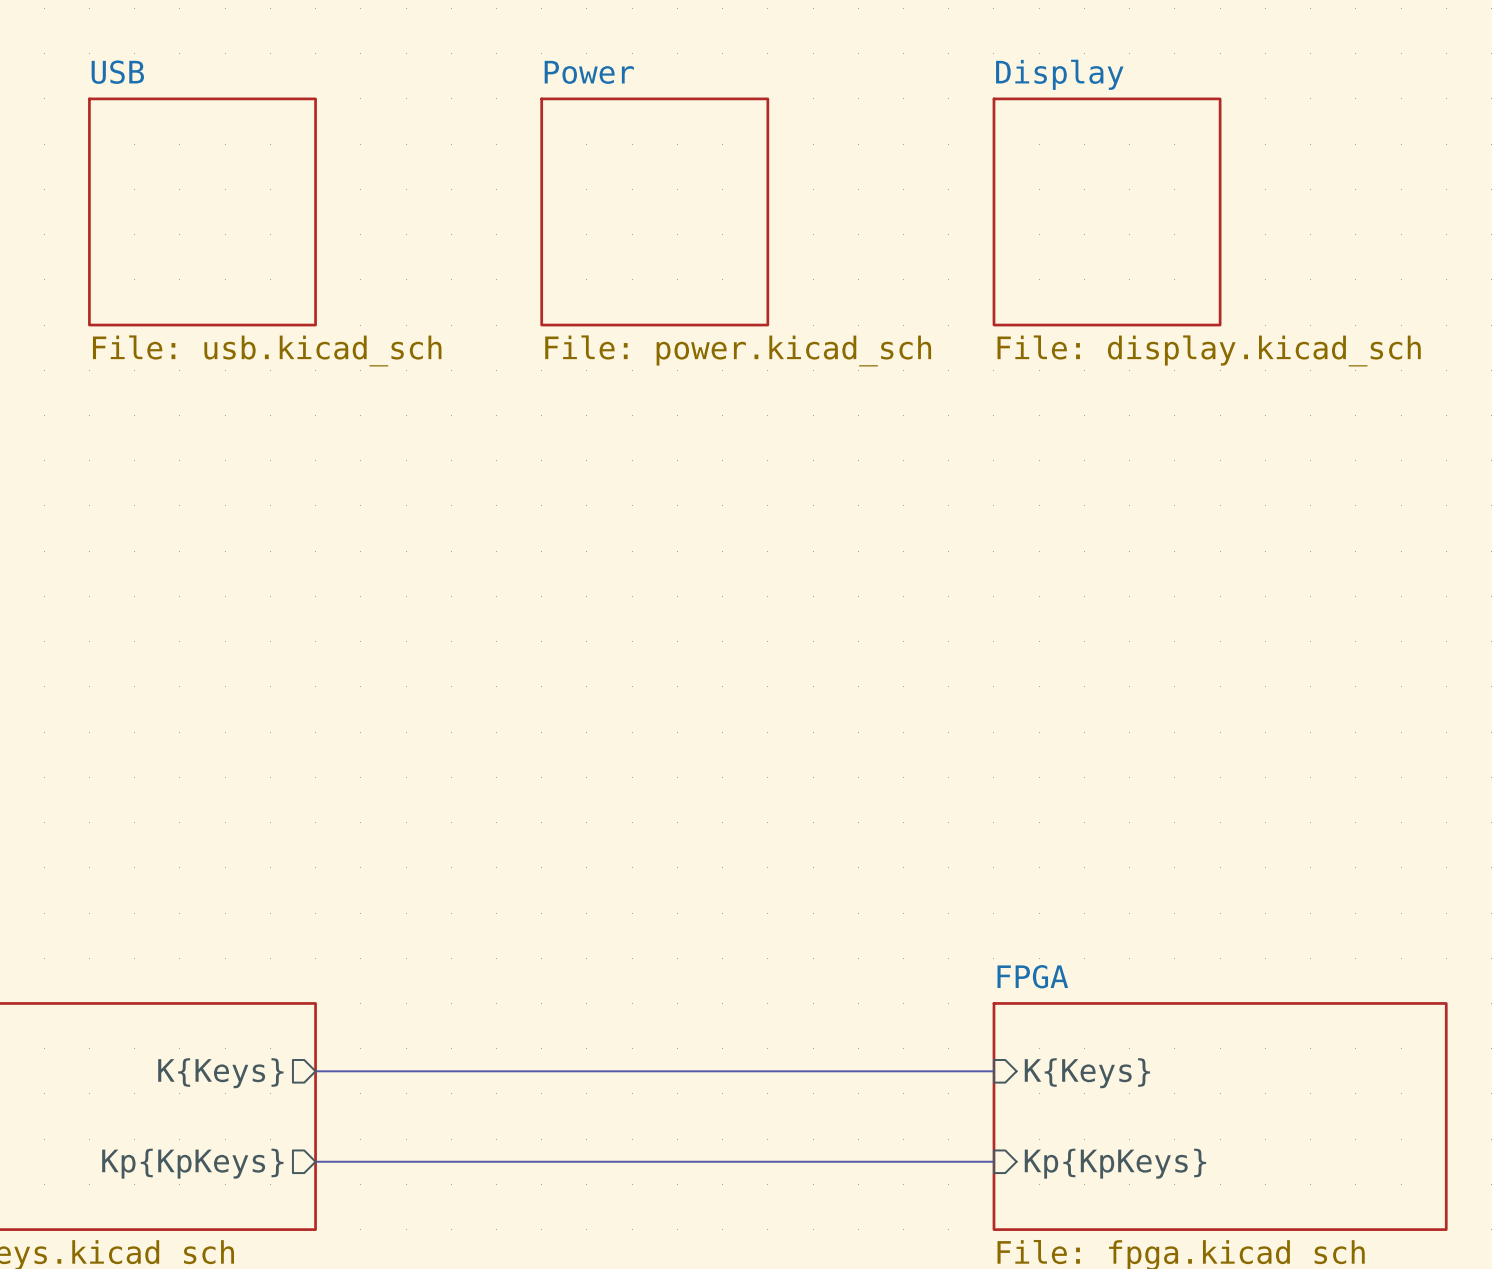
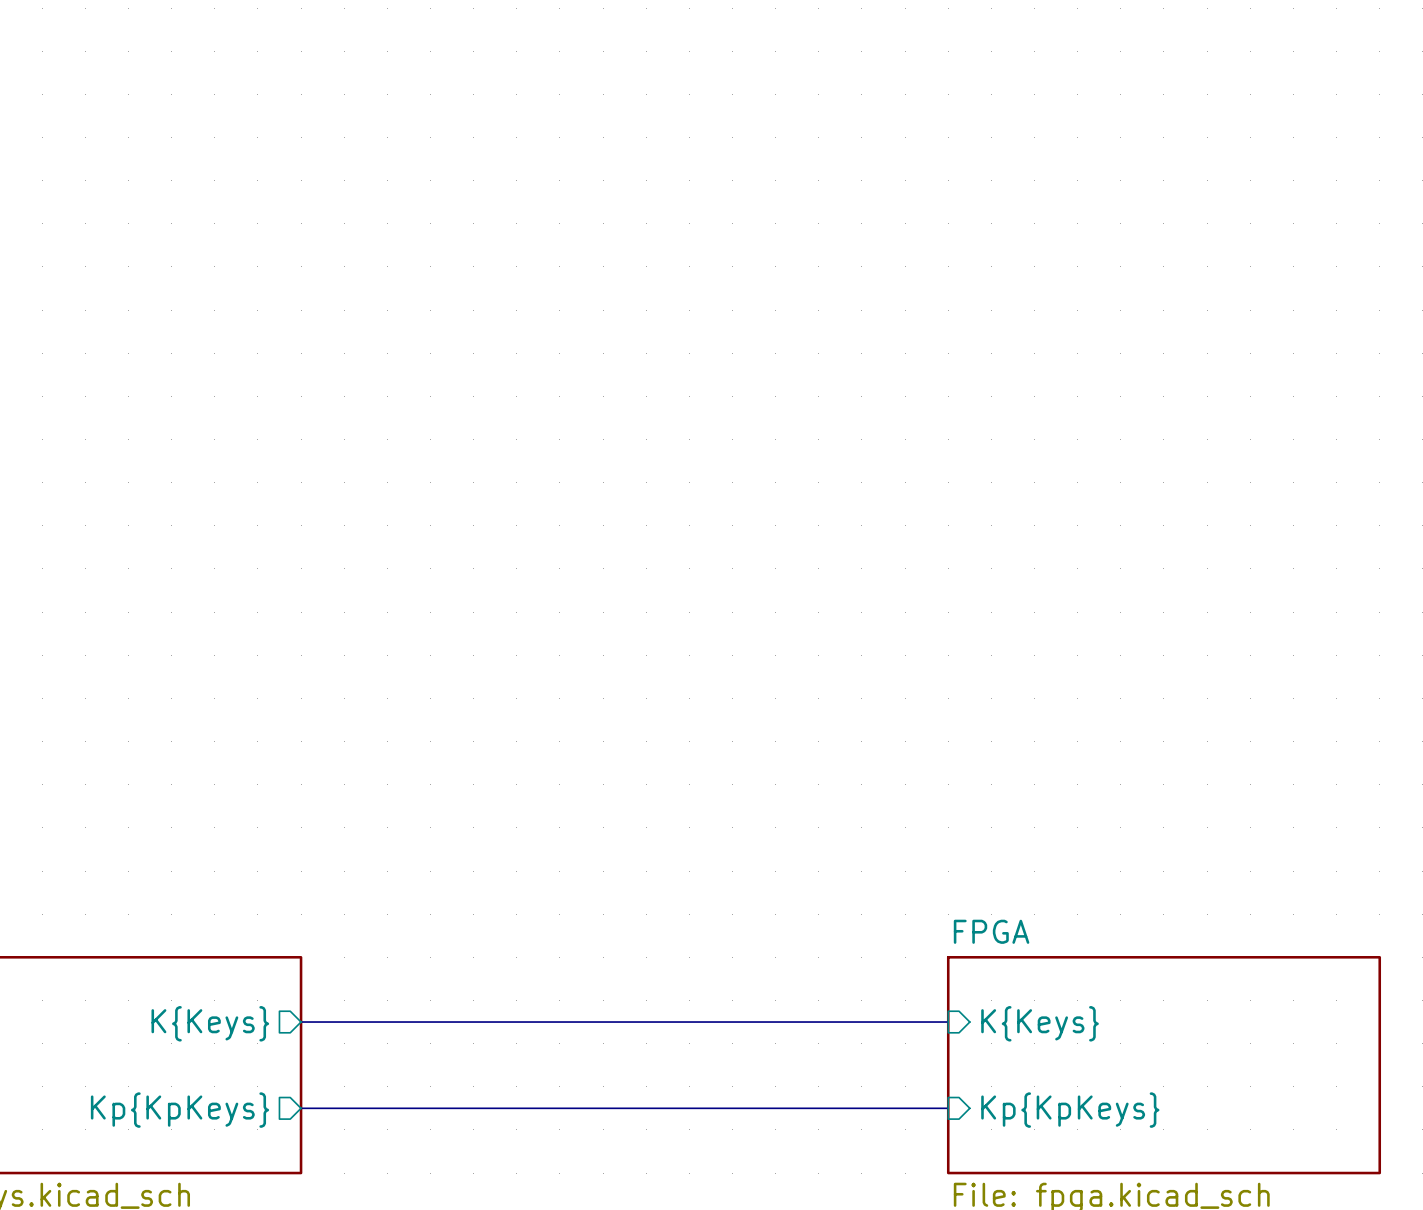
sheet USB: File: usb.kicad_sch (202, 211) -> none
sheet Power: File: power.kicad_sch (654, 211) -> none
sheet Display: File: display.kicad_sch (1107, 211) -> none

